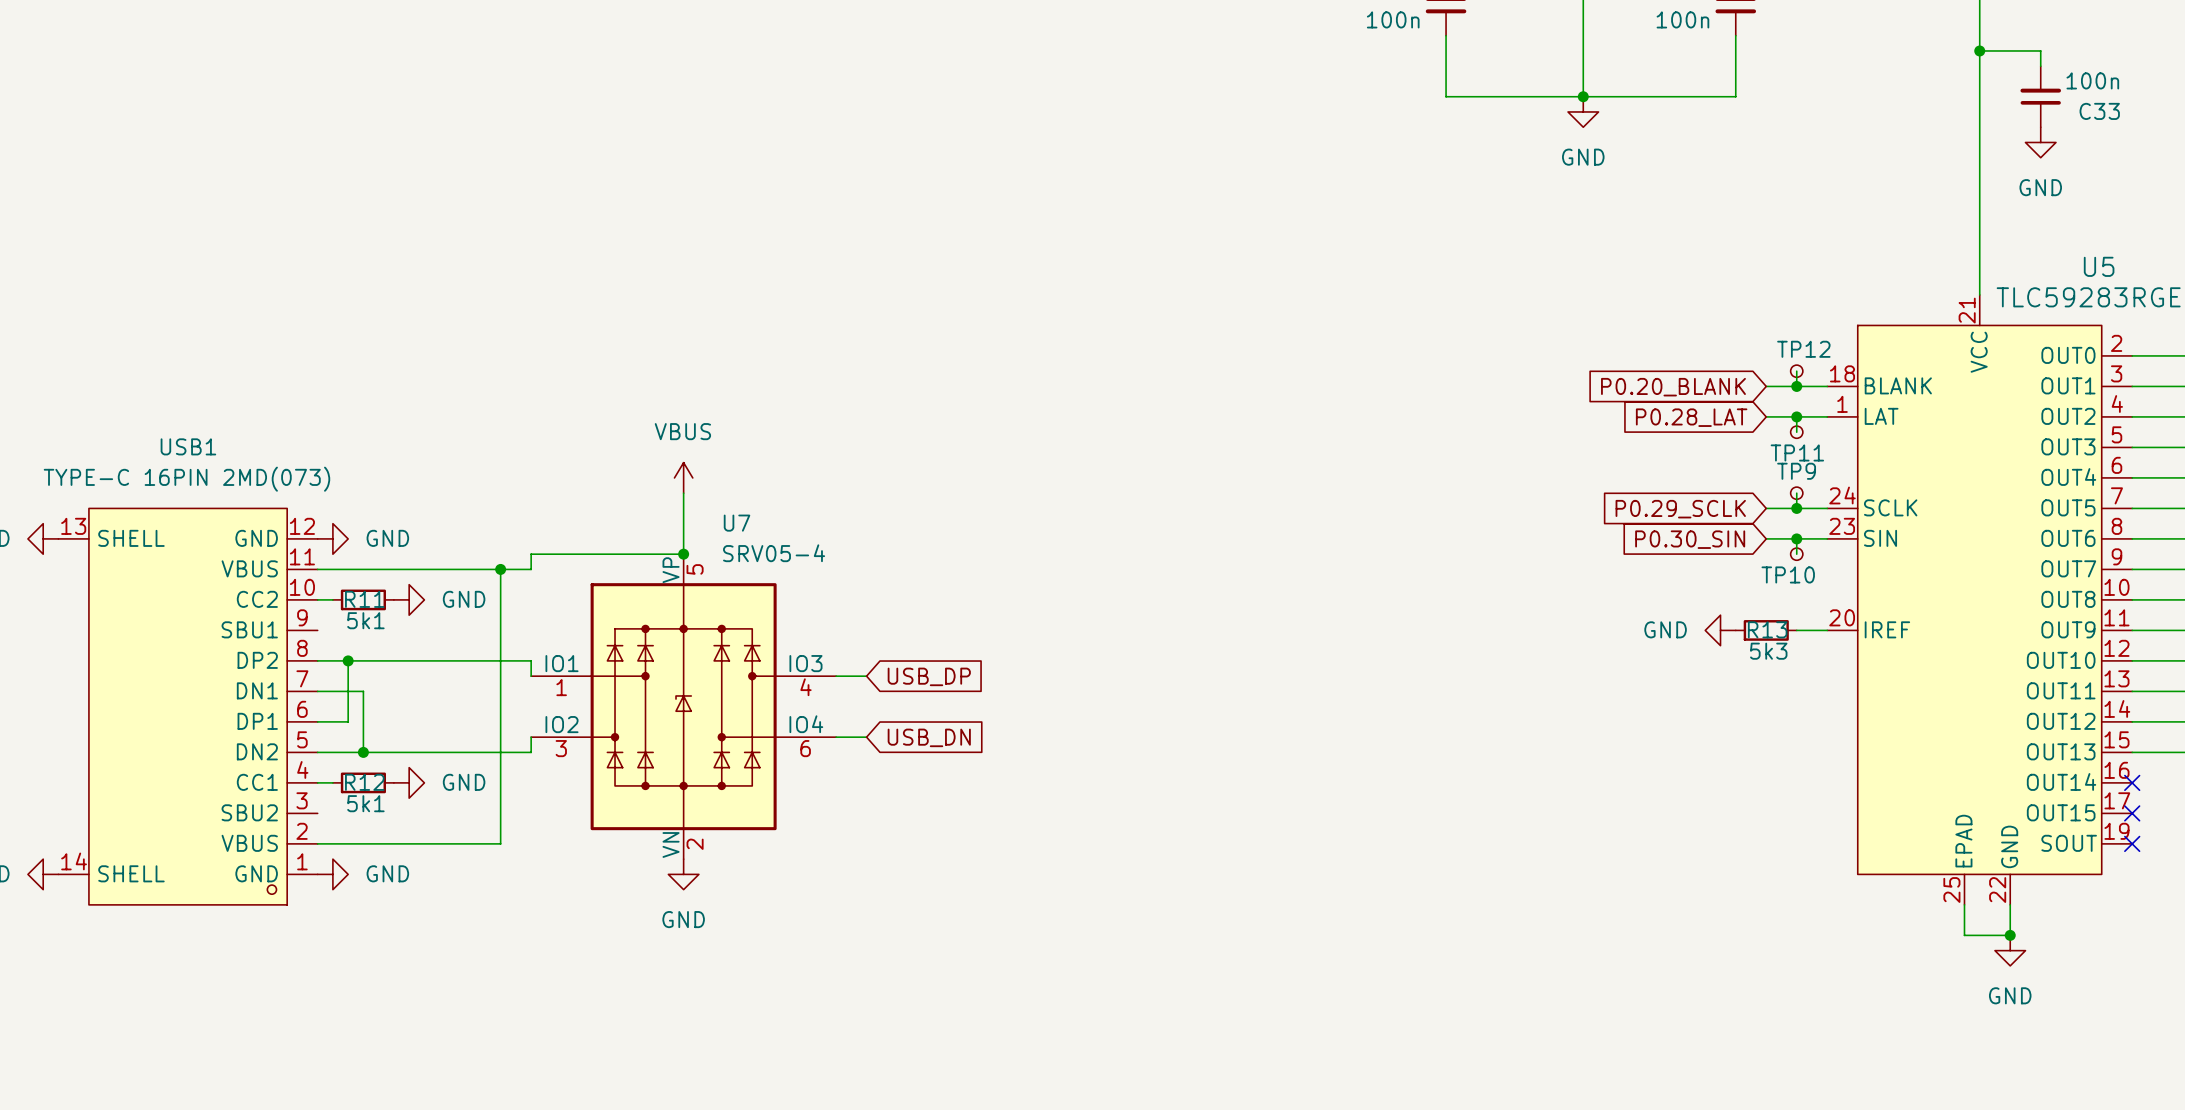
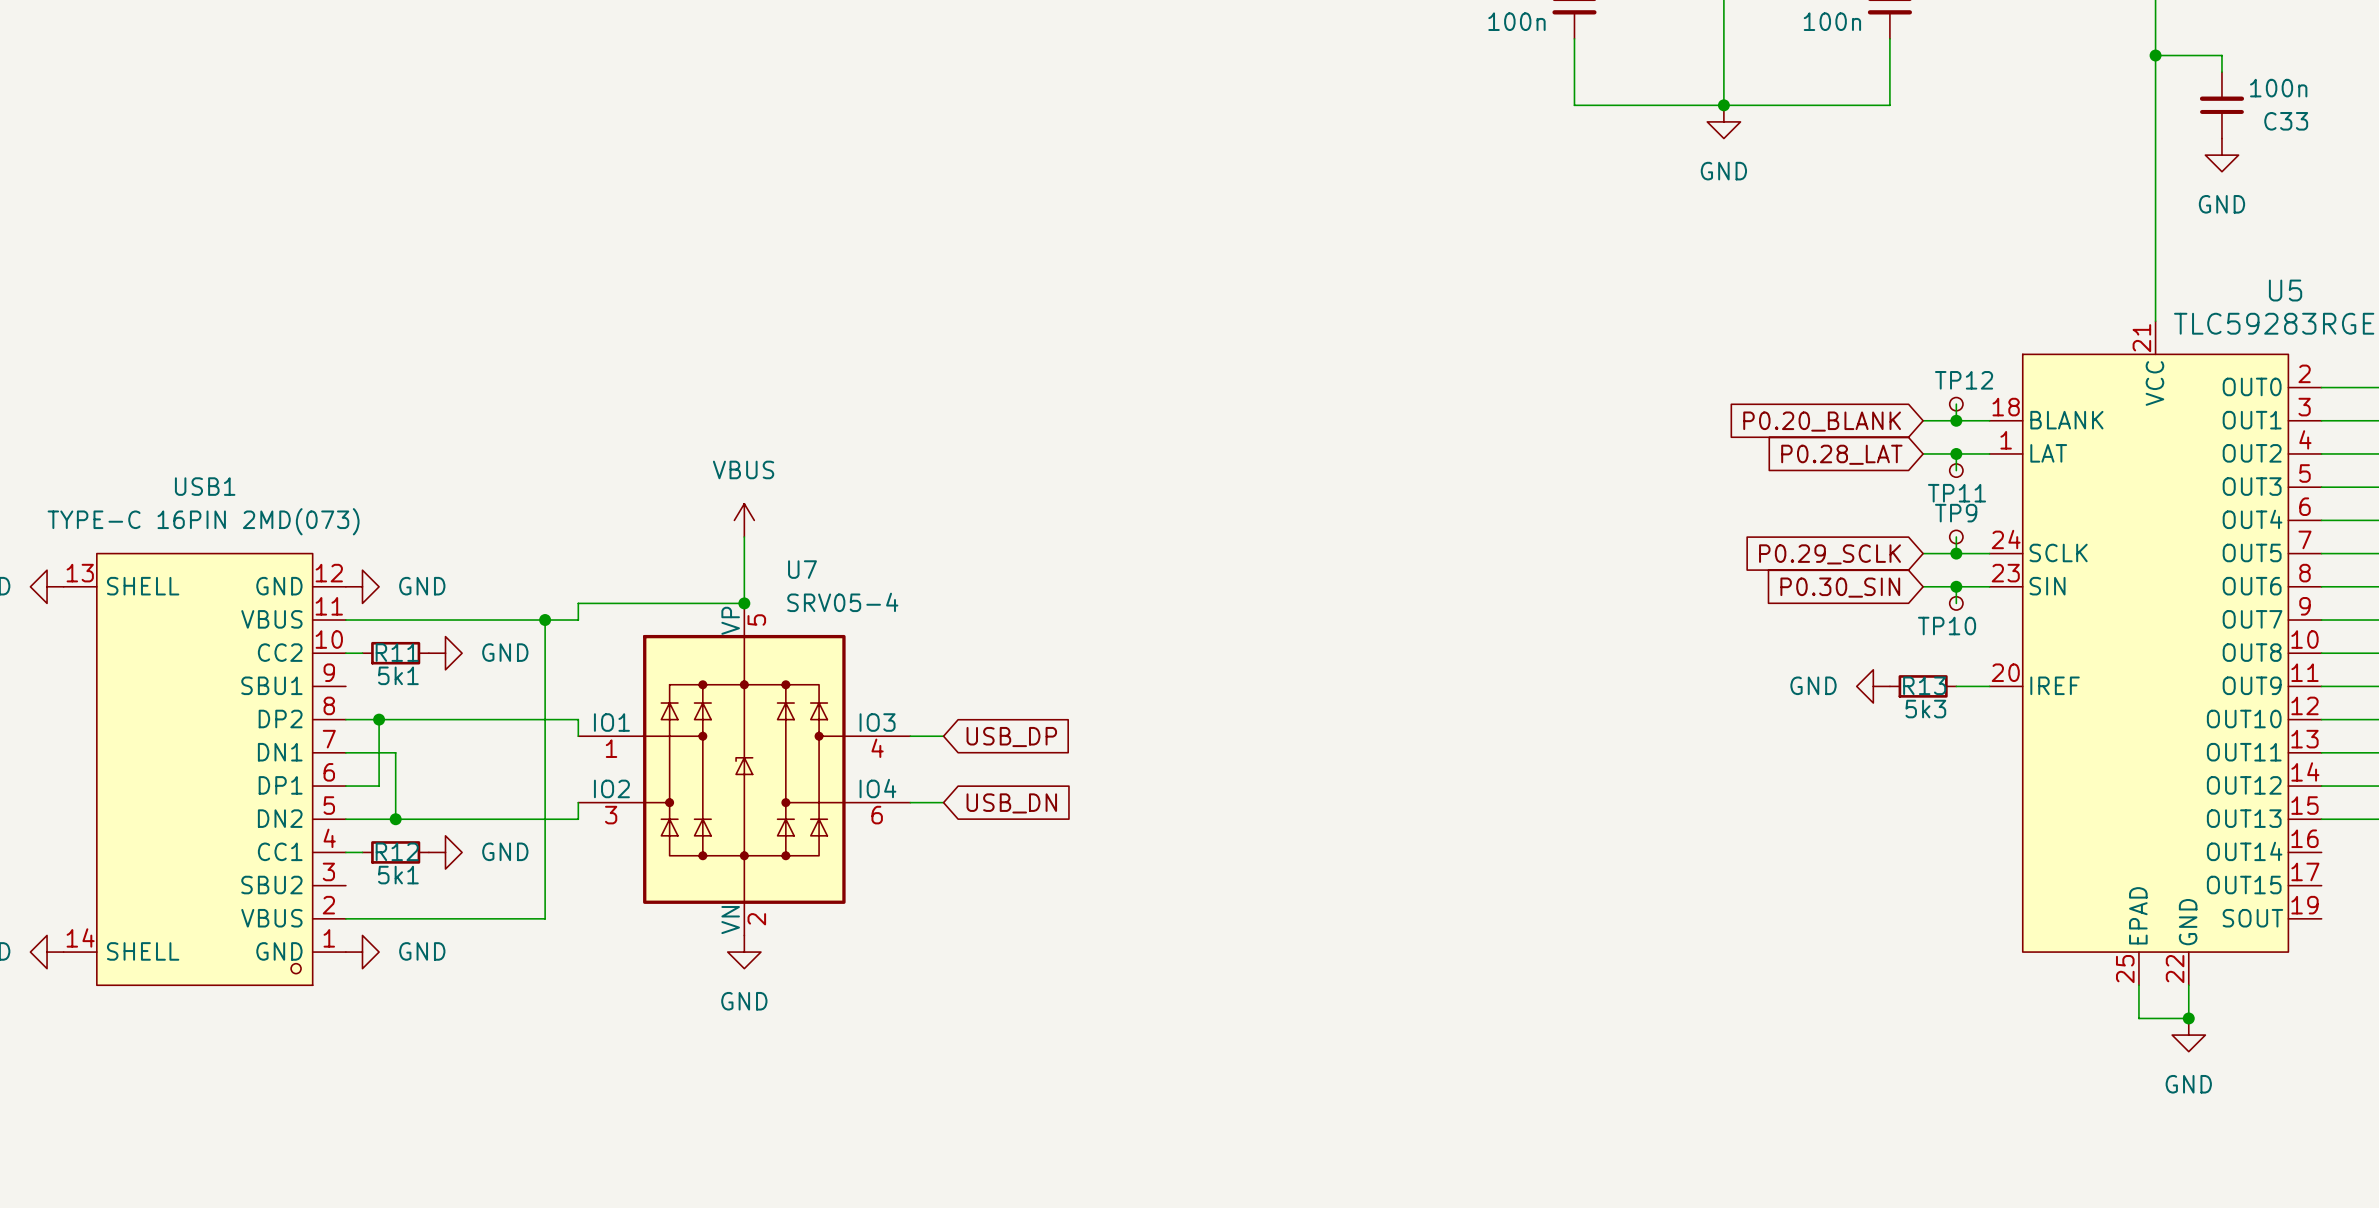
no-connect mark: (2132, 782) -> none
no-connect mark: (2132, 813) -> none
no-connect mark: (2132, 843) -> none

